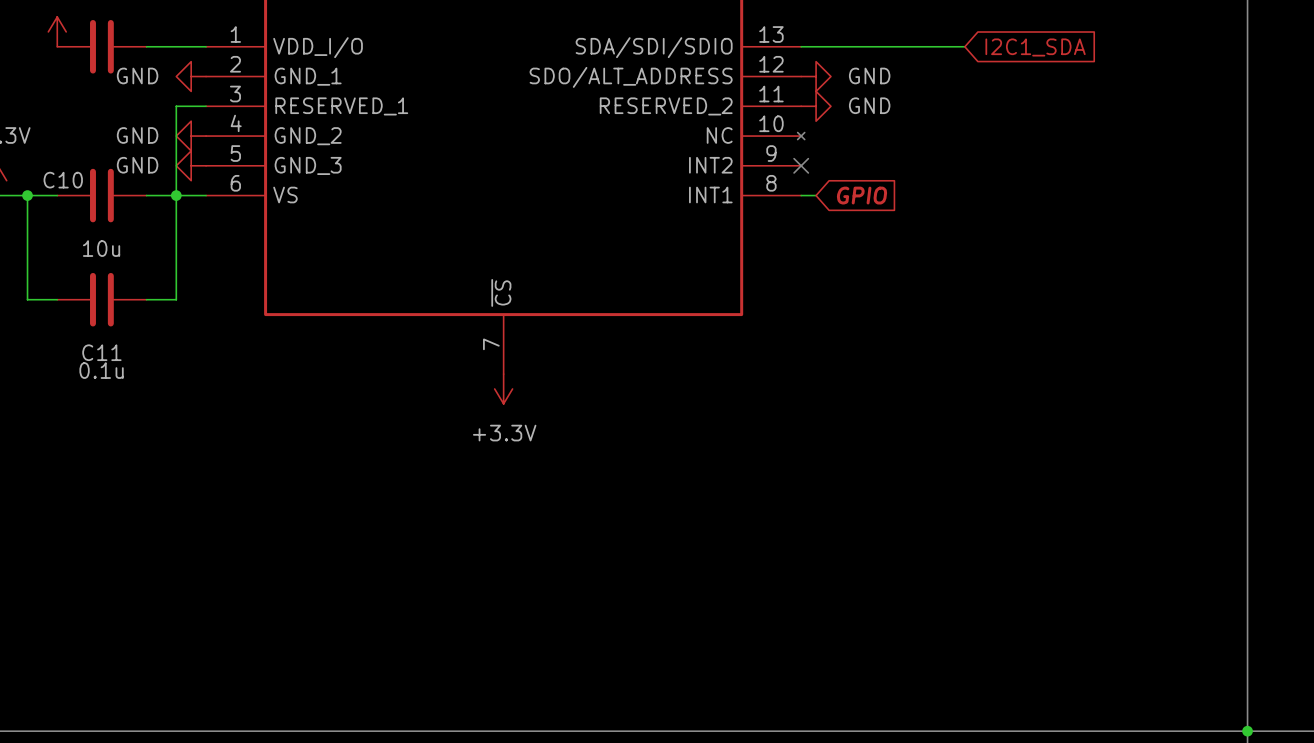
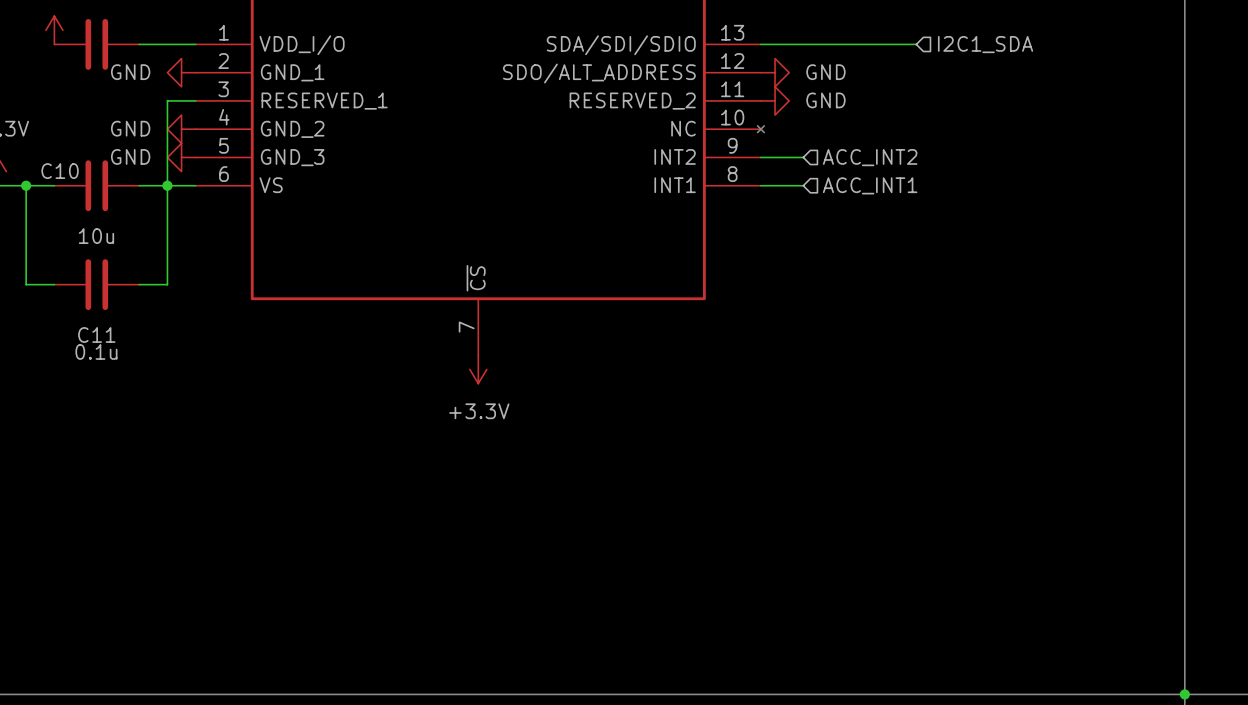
hierarchical label: none -> I2C1_SDA (985, 44)
global label: I2C1_SDA (1035, 47) -> none
wire: none -> (760, 157) (803, 157)
no-connect mark: (801, 165) -> none
hierarchical label: none -> ACC_INT2 (870, 157)
wire: none -> (775, 185) (803, 185)
global label: GPIO (862, 195) -> none
hierarchical label: none -> ACC_INT1 (870, 185)

